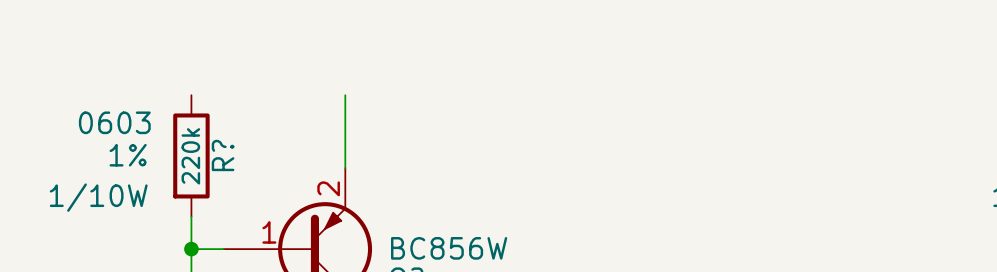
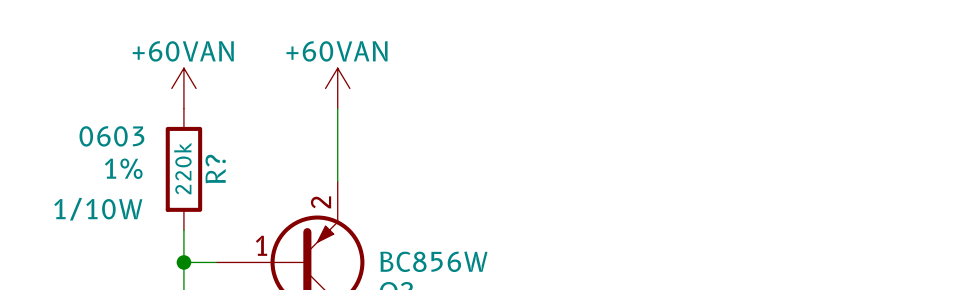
power symbol: none -> +60VAN (183, 88)
power symbol: none -> +60VAN (337, 88)

